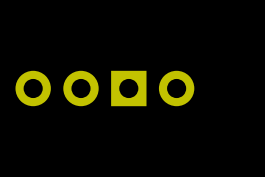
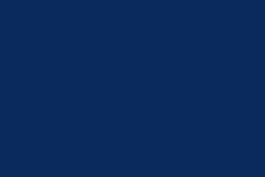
part: (104, 88) -> none

